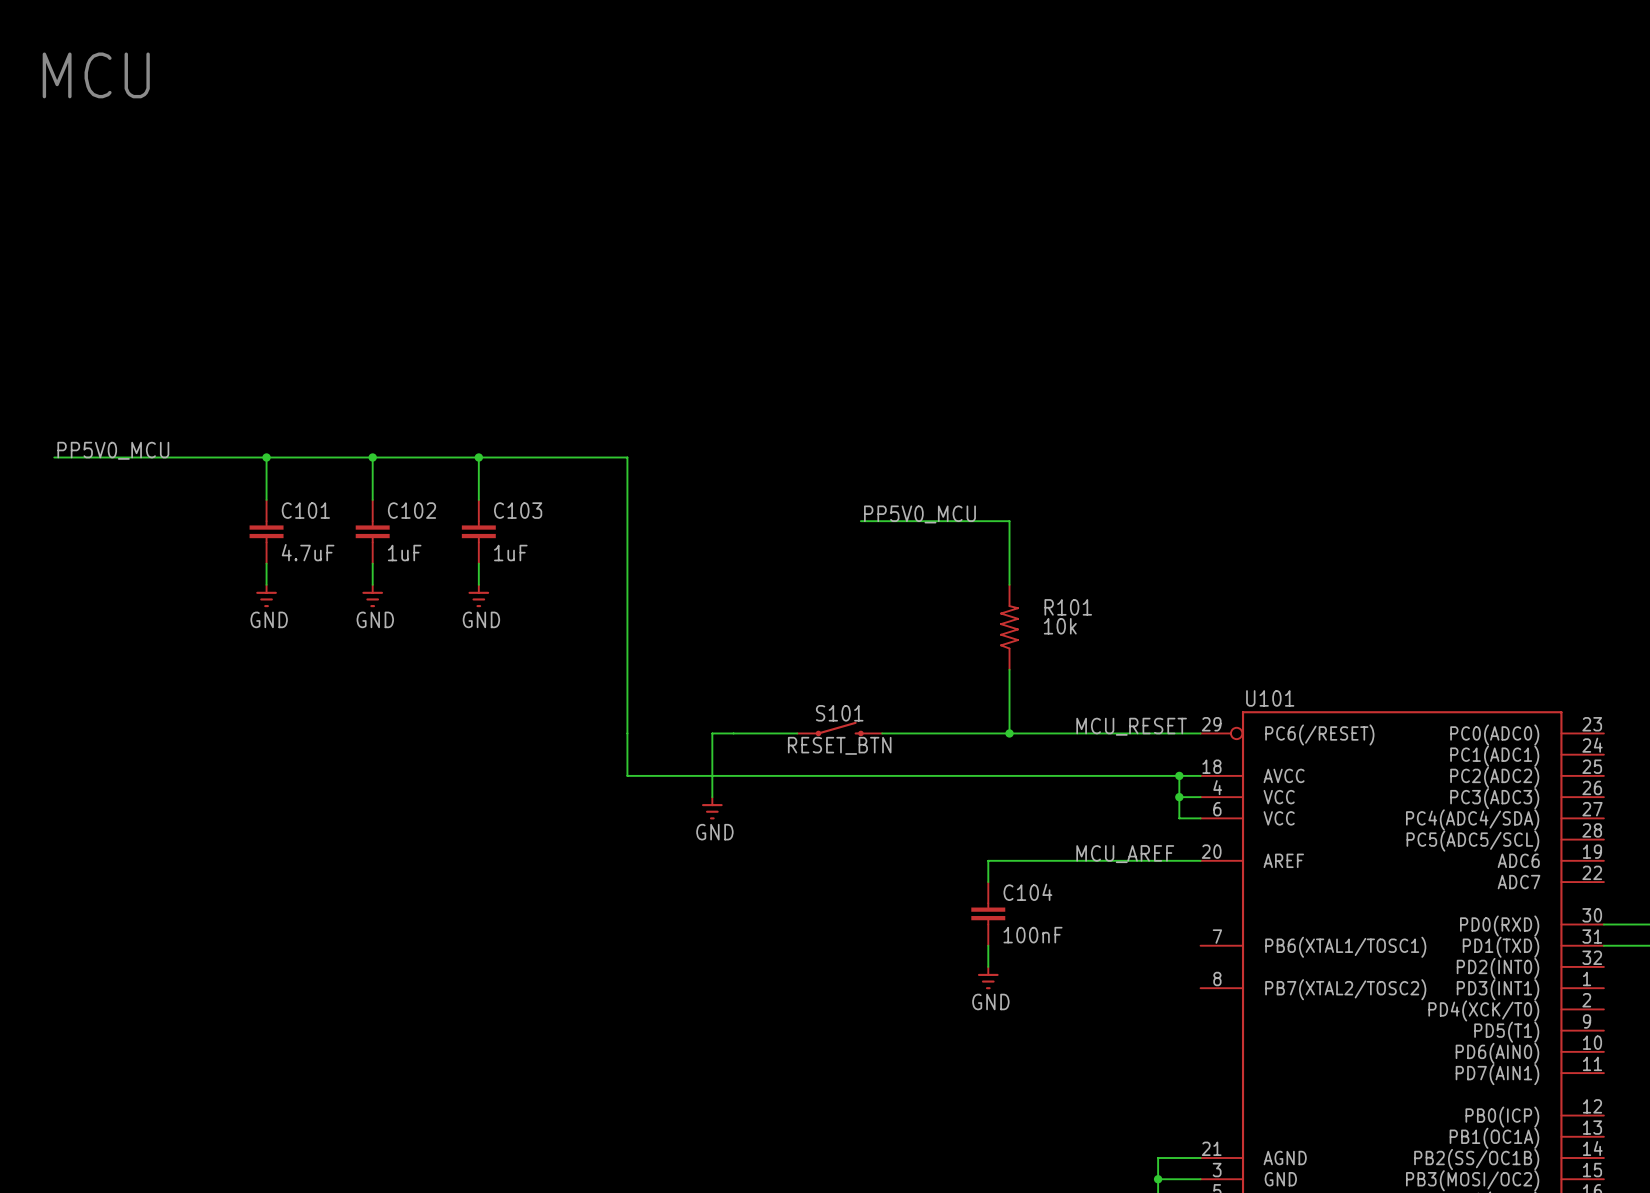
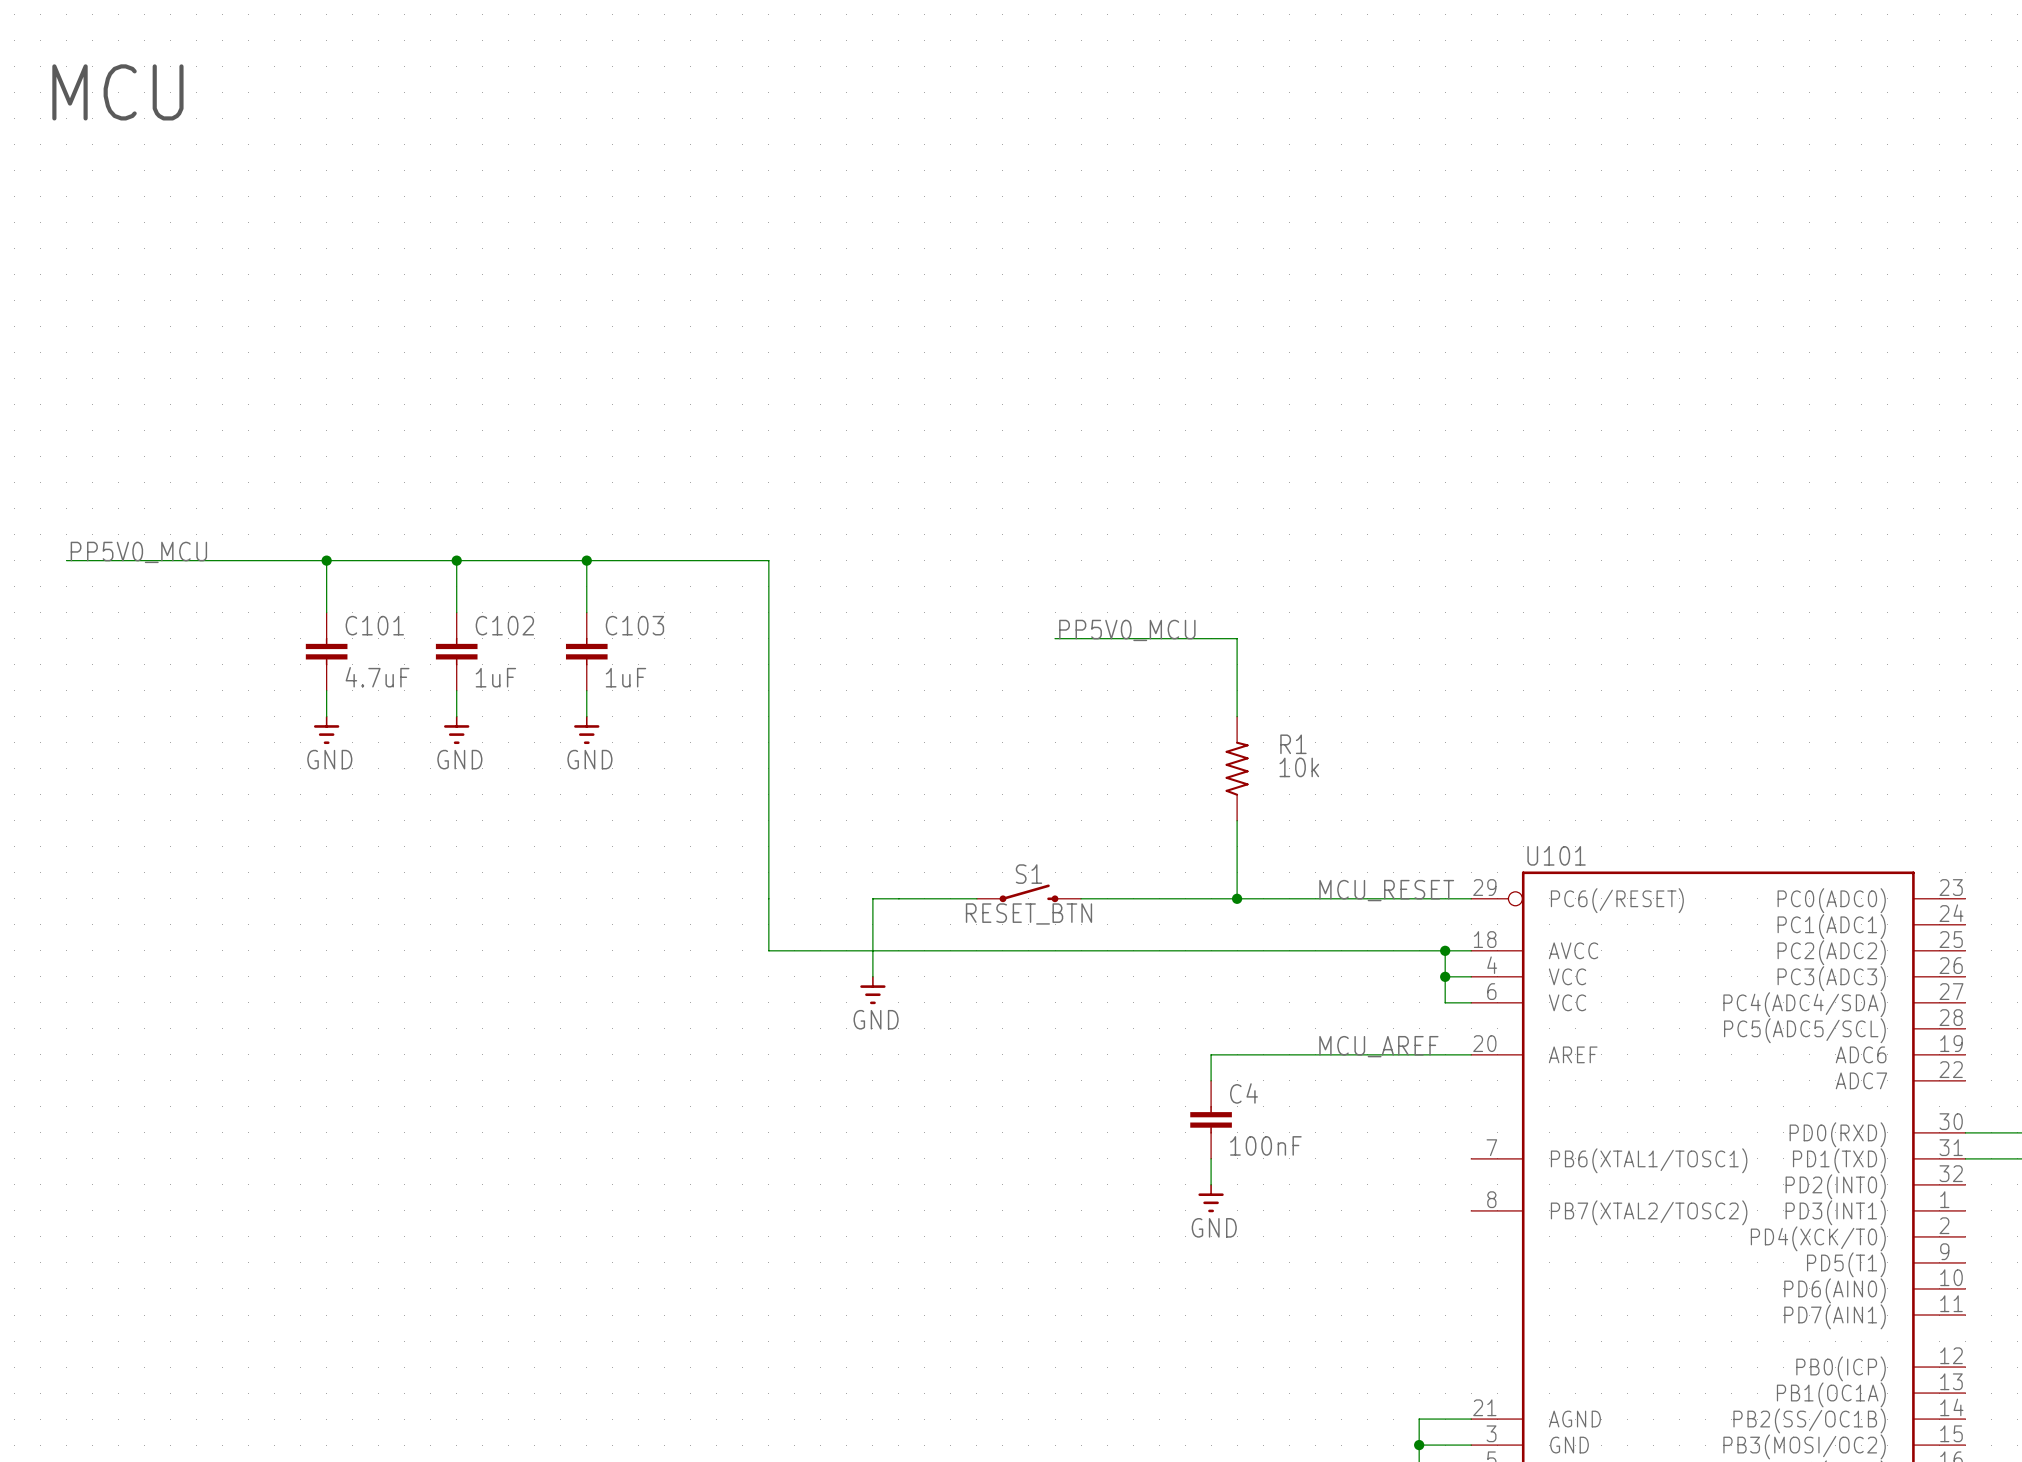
R101 name: R101 (1068, 607) -> R1 (1293, 744)
S101 name: S101 (839, 713) -> S1 (1028, 874)
C104 name: C104 (1027, 892) -> C4 (1244, 1093)

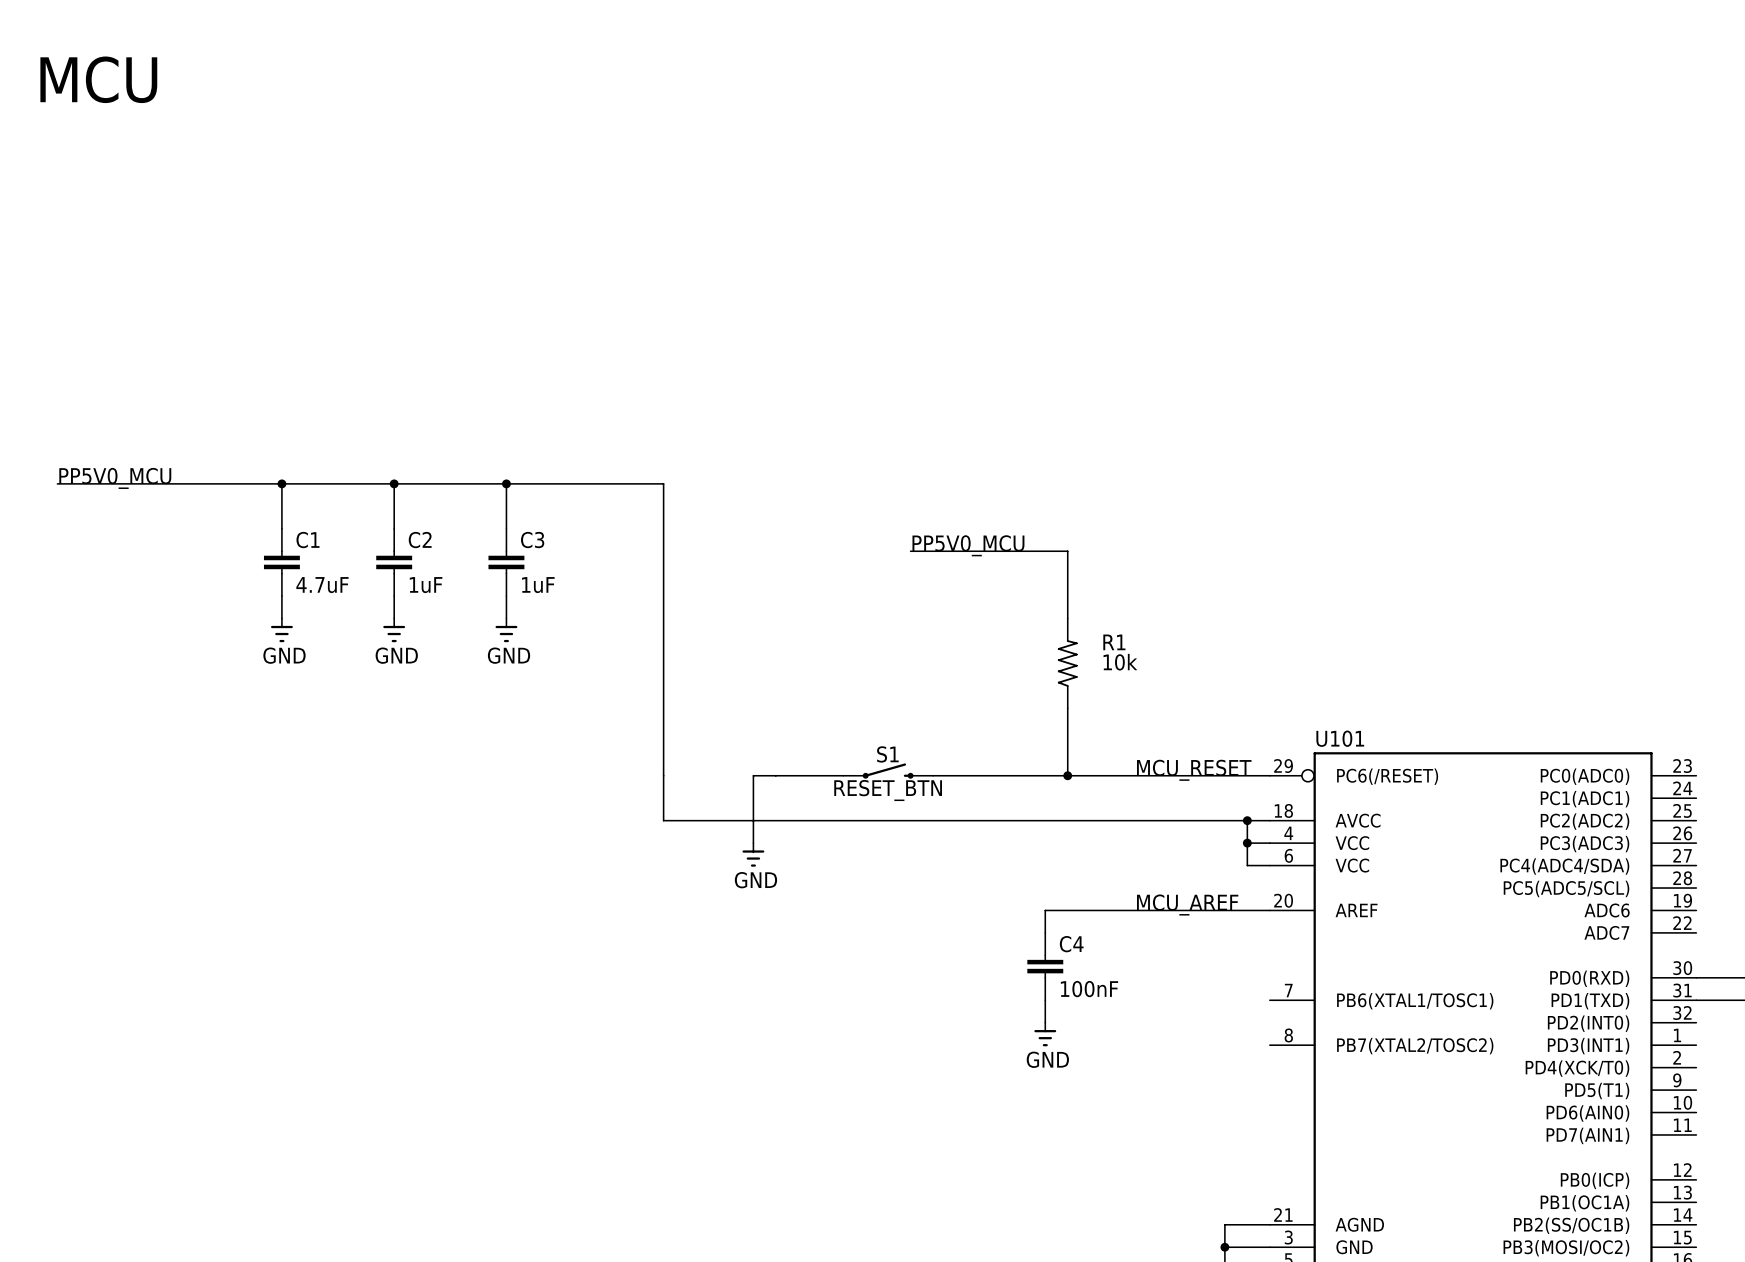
C101 name: C101 (374, 625) -> C1 (307, 540)
C102 name: C102 (504, 625) -> C2 (420, 540)
C103 name: C103 (634, 625) -> C3 (532, 540)

